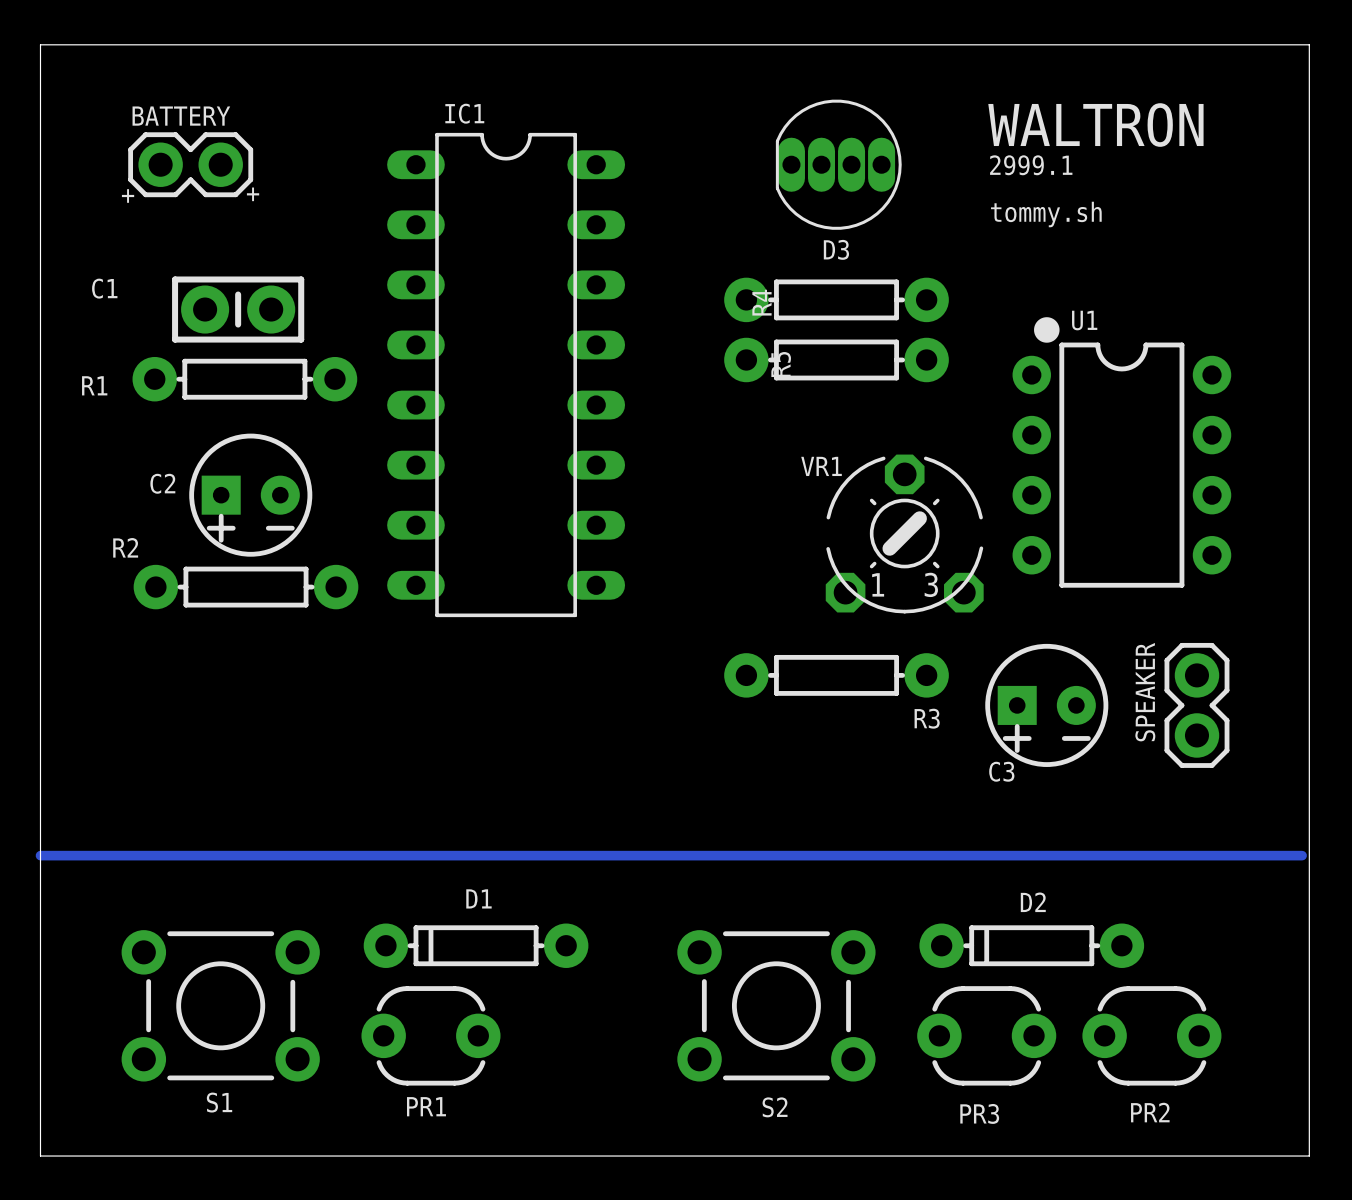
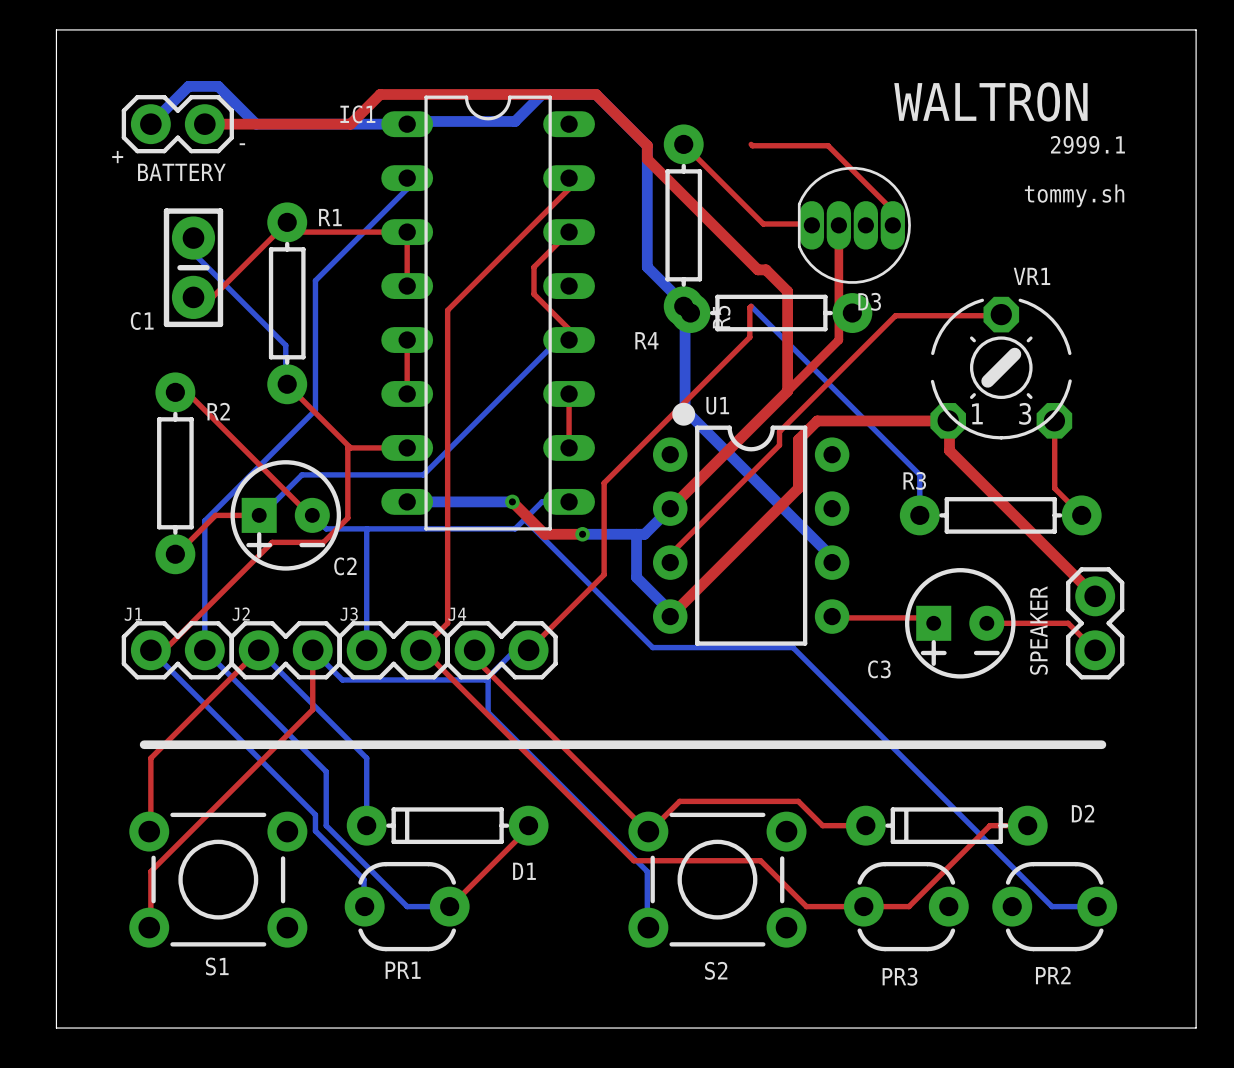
IC1 name position: IC1 (464, 113) -> IC1 (357, 114)
BATTERY name position: BATTERY (181, 116) -> BATTERY (181, 172)
text position: WALTRON (1095, 125) -> WALTRON (990, 101)
bottom track: none -> (150, 124) (188, 86) (218, 86) (256, 124) (407, 124) (409, 121) (515, 121) (542, 94) (596, 94) (647, 145) (647, 267) (682, 302) (685, 307) (685, 410) (830, 555) (832, 562)
top track: none -> (204, 124) (350, 124) (380, 94) (596, 94) (647, 145) (647, 159) (757, 269) (766, 269) (787, 291) (787, 391)
BATTERY position: (190, 164) -> (177, 124)
D3 position: (838, 164) -> (854, 225)
text position: 2999.1 (1031, 165) -> 2999.1 (1087, 144)
text: none -> - (242, 144)
top track: none -> (683, 144) (763, 224) (811, 225)
top track: none -> (751, 144) (828, 145) (892, 210) (892, 225)
text: + (253, 194) -> none
text position: + (128, 196) -> + (117, 157)
bottom track: none -> (407, 178) (407, 188) (315, 280) (315, 410) (204, 520) (204, 650) (326, 771) (326, 825) (407, 906) (449, 906)
top track: none -> (569, 178) (569, 188) (447, 310) (447, 623) (420, 650) (423, 650) (633, 860) (760, 860) (806, 906) (909, 906) (989, 825) (1027, 825)
text position: tommy.sh (1046, 214) -> tommy.sh (1074, 195)
D3 name position: D3 (836, 249) -> D3 (869, 301)
top track: none -> (838, 225) (838, 340) (787, 391)
top track: none -> (569, 232) (533, 267) (533, 294) (569, 329) (569, 340)
bottom track: none -> (193, 238) (194, 253) (285, 345) (287, 384)
text position: C1 (104, 288) -> C1 (142, 321)
R4 rotation: 0° (836, 299) -> 90° clockwise (683, 225)
R4 name position: R4 (761, 302) -> R4 (646, 340)
part rotation: 0° (238, 309) -> 90° clockwise (193, 267)
top track: none -> (407, 286) (407, 232) (296, 232) (287, 222) (212, 296) (193, 297)
bottom track: none -> (751, 306) (919, 474) (919, 515)
top track: none -> (751, 306) (749, 337) (604, 483) (604, 574) (528, 650)
top track: none -> (1001, 314) (895, 315) (779, 431) (779, 445) (671, 553) (670, 562)
IC1 position: (506, 375) -> (488, 313)
R1 rotation: 0° (244, 379) -> 90° clockwise (287, 303)
R1 name position: R1 (94, 385) -> R1 (330, 217)
top track: none -> (407, 340) (407, 393)
bottom track: none -> (569, 340) (558, 340) (423, 474) (301, 474) (261, 515) (259, 515)
top track: none -> (287, 384) (350, 447) (407, 447)
top track: none -> (787, 391) (670, 508)
top track: none -> (175, 392) (188, 393) (310, 515) (312, 515)
top track: none -> (569, 393) (569, 447)
U1 position: (1121, 452) -> (751, 524)
VR1 name position: VR1 (821, 466) -> VR1 (1031, 276)
top track: none -> (1054, 420) (1054, 488) (1081, 515)
C2 name position: C2 (162, 483) -> C2 (345, 566)
C2 position: (250, 495) -> (285, 515)
top track: none -> (349, 446) (347, 518) (323, 542) (272, 542) (164, 650) (150, 650)
VR1 position: (904, 533) -> (1001, 368)
R2 name position: R2 (125, 547) -> R2 (218, 411)
bottom track: none -> (407, 501) (512, 501)
top track: none -> (512, 501) (544, 534) (582, 534)
via: none -> (512, 501)
bottom track: none -> (569, 501) (542, 501) (515, 528) (326, 528) (312, 515)
bottom track: none -> (670, 508) (644, 534) (582, 534)
top track: none -> (259, 515) (215, 515) (175, 554)
R2 rotation: 0° (246, 587) -> 90° clockwise (175, 473)
bottom track: none -> (524, 519) (652, 647) (793, 647) (1052, 906) (1097, 906)
bottom track: none -> (366, 528) (366, 650)
via: none -> (582, 534)
bottom track: none -> (636, 534) (636, 577) (668, 609) (670, 616)
R3 position: (836, 675) -> (1000, 515)
top track: none -> (1095, 596) (949, 450) (949, 420) (817, 420) (798, 439) (798, 488) (670, 616)
SPEAKER name position: SPEAKER (1145, 692) -> SPEAKER (1038, 630)
top track: none -> (832, 616) (919, 617) (926, 623)
top track: none -> (980, 623) (1068, 623) (1095, 650)
R3 name position: R3 (927, 718) -> R3 (914, 480)
bottom track: none -> (150, 650) (315, 814) (315, 831) (364, 879) (364, 906)
J1: none -> (177, 650)
bottom track: none -> (258, 650) (366, 758) (366, 825)
top track: none -> (258, 650) (150, 758) (150, 831) (149, 831)
J2: none -> (285, 650)
bottom track: none -> (312, 650) (342, 679) (485, 679) (515, 650) (528, 650)
top track: none -> (312, 650) (312, 709) (150, 871) (150, 925) (149, 927)
J3: none -> (393, 650)
top track: none -> (474, 650) (474, 658) (648, 831) (679, 801) (798, 801) (822, 825) (865, 825)
J4: none -> (501, 650)
bottom track: none -> (486, 678) (488, 712) (647, 871) (648, 927)
C3 name position: C3 (1001, 771) -> C3 (879, 669)
line: none -> (144, 744) (1101, 744)
bottom track: (40, 855) (1302, 855) -> none
D1 name position: D1 (478, 898) -> D1 (524, 871)
D2 name position: D2 (1033, 902) -> D2 (1083, 813)
top track: none -> (528, 825) (528, 828) (449, 906)
D1 position: (476, 945) -> (447, 825)
D2 position: (1031, 945) -> (946, 825)
S1 position: (220, 1005) -> (218, 879)
S2 position: (776, 1005) -> (717, 879)
PR1 position: (430, 1035) -> (407, 906)
PR3 position: (986, 1035) -> (906, 906)
PR2 position: (1151, 1035) -> (1054, 906)

